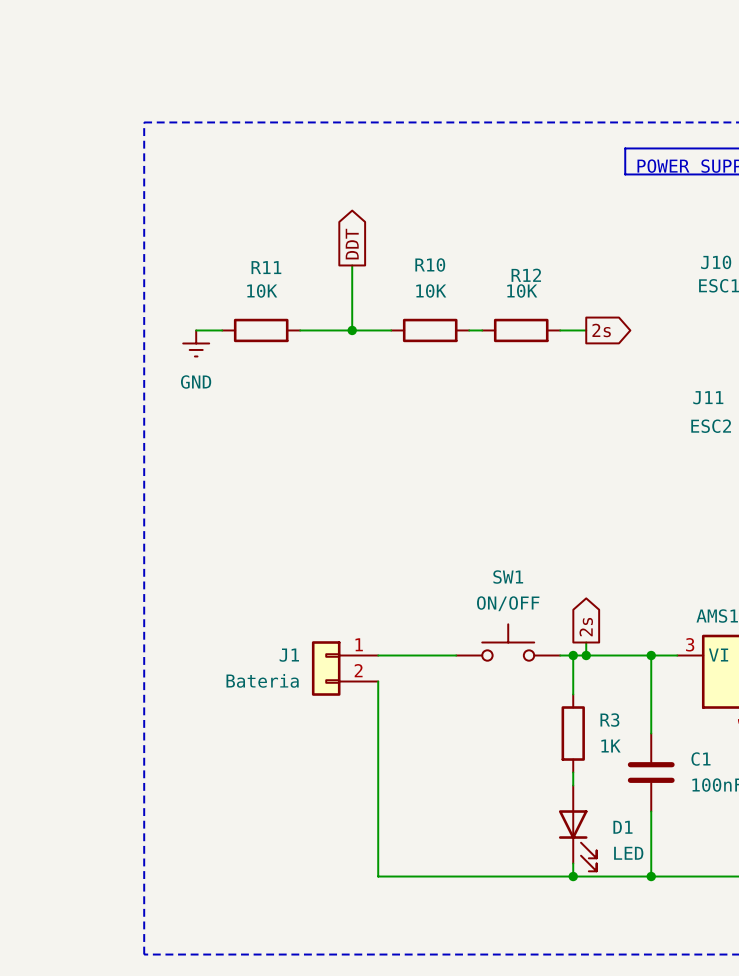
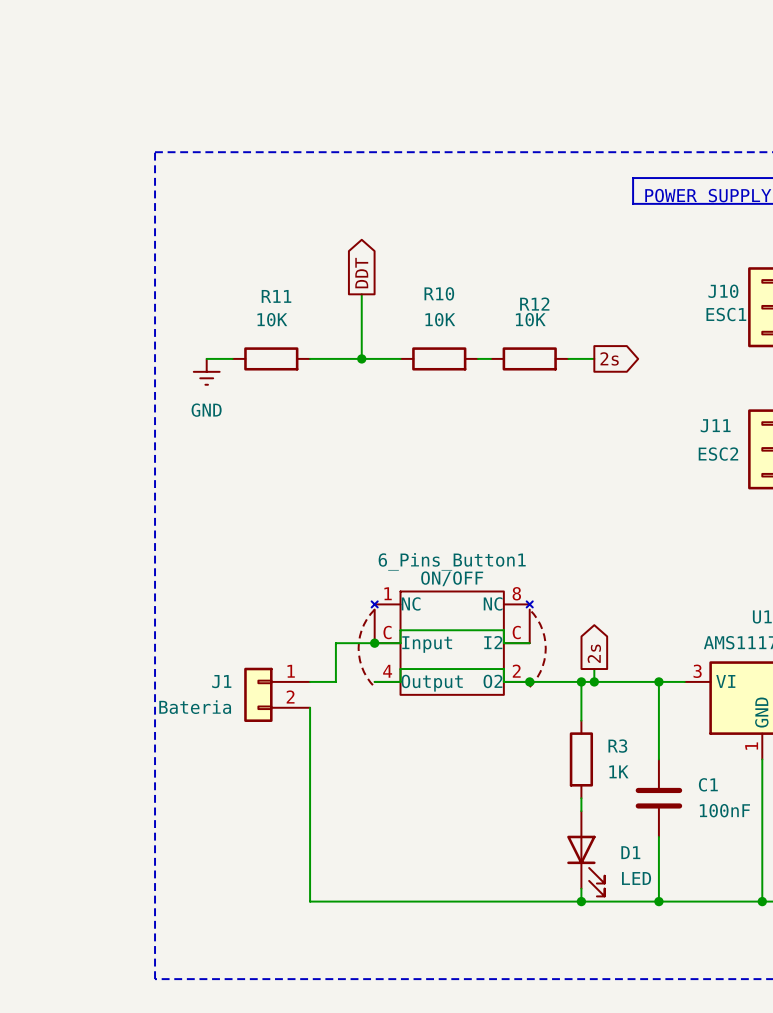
junction: none -> (374, 643)
6_Pins_Button1: none -> ON/OFF (452, 643)
wire: none -> (529, 643) (503, 643) (503, 630) (400, 630) (400, 643) (335, 643) (335, 681) (310, 681)
SW1: ON/OFF (508, 642) -> none
wire: (391, 655) (456, 655) -> (400, 681) (400, 669) (503, 669) (503, 681) (568, 681)
junction: none -> (529, 681)
J1 position: (345, 668) -> (277, 694)
wire: (378, 681) (378, 876) -> (310, 707) (310, 901) (387, 901)

